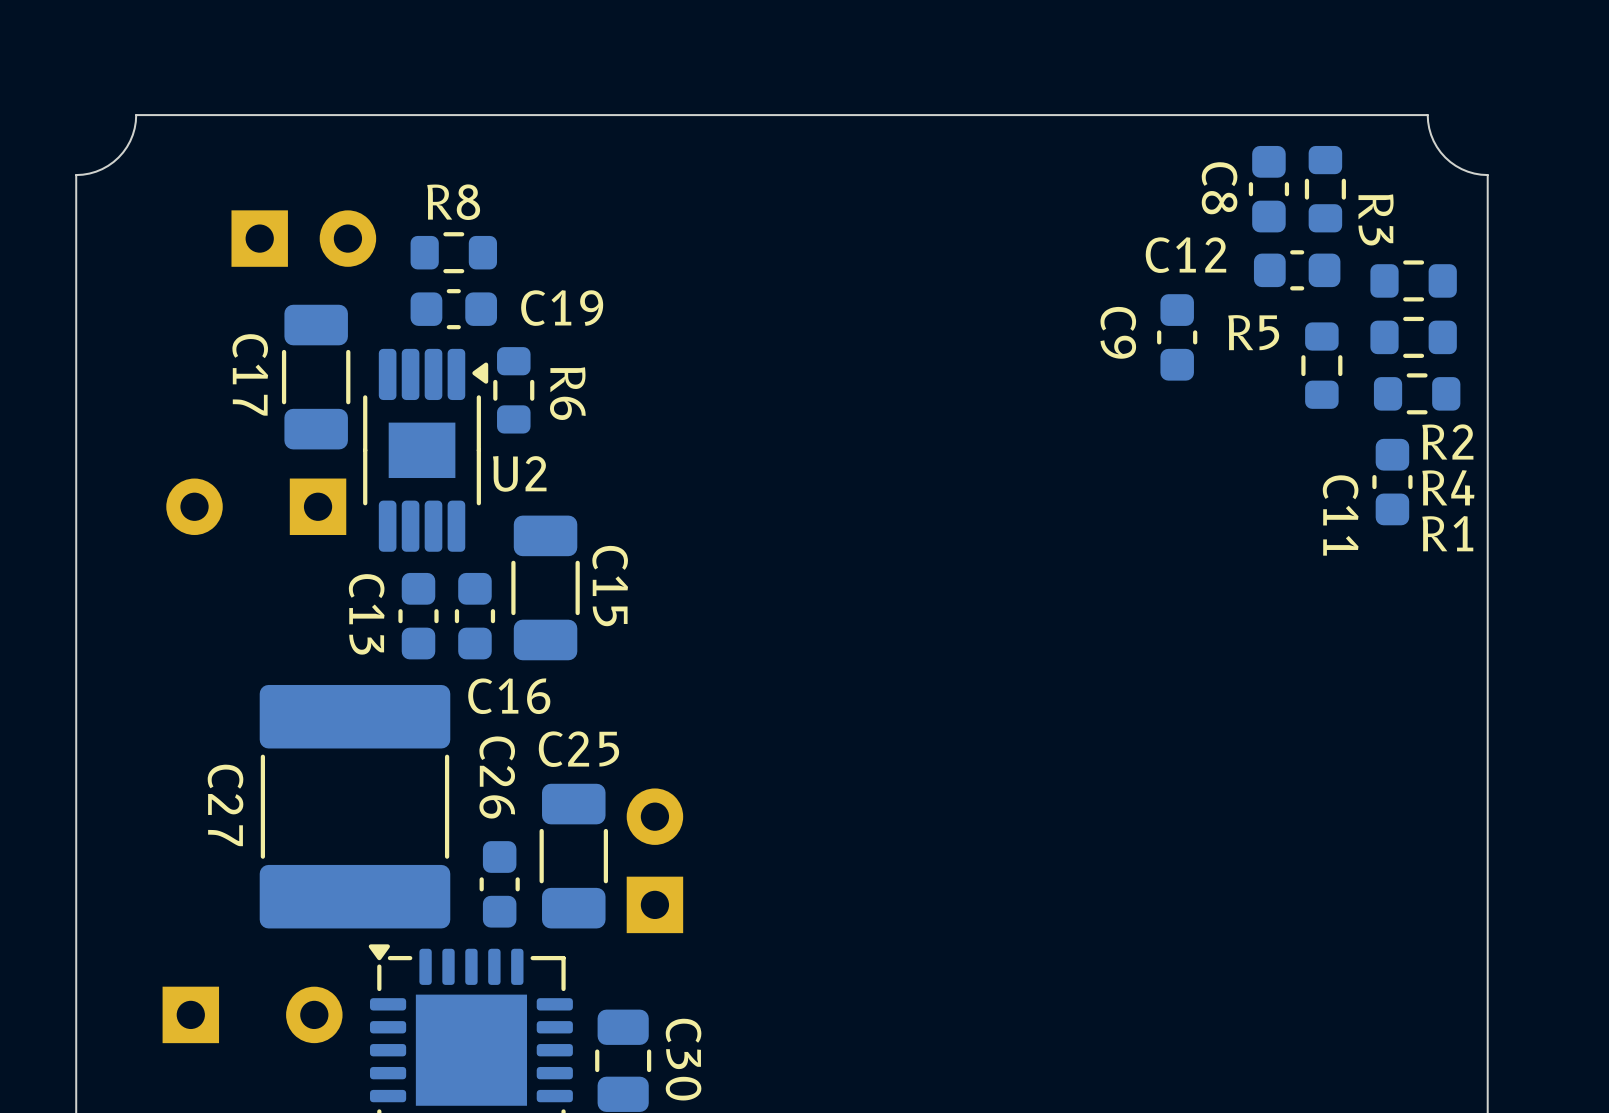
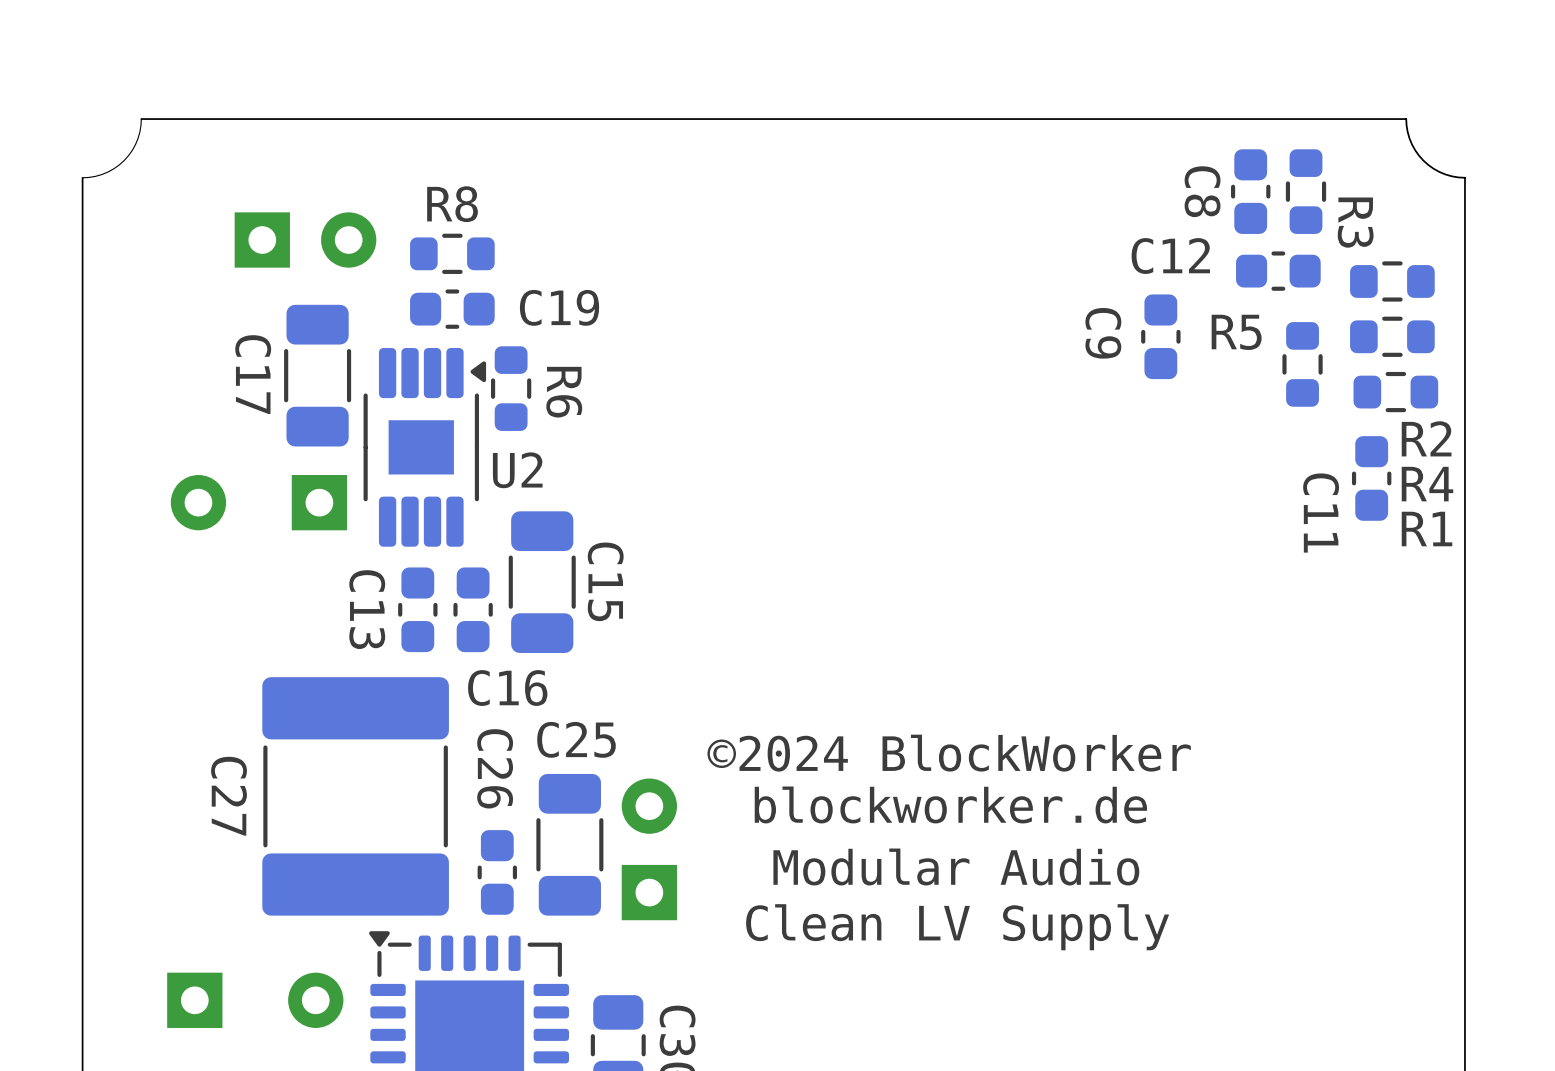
drawing: none -> [707, 734, 1191, 824]
text: none -> Modular Audio (956, 867)
text: none -> Clean LV Supply (957, 927)

